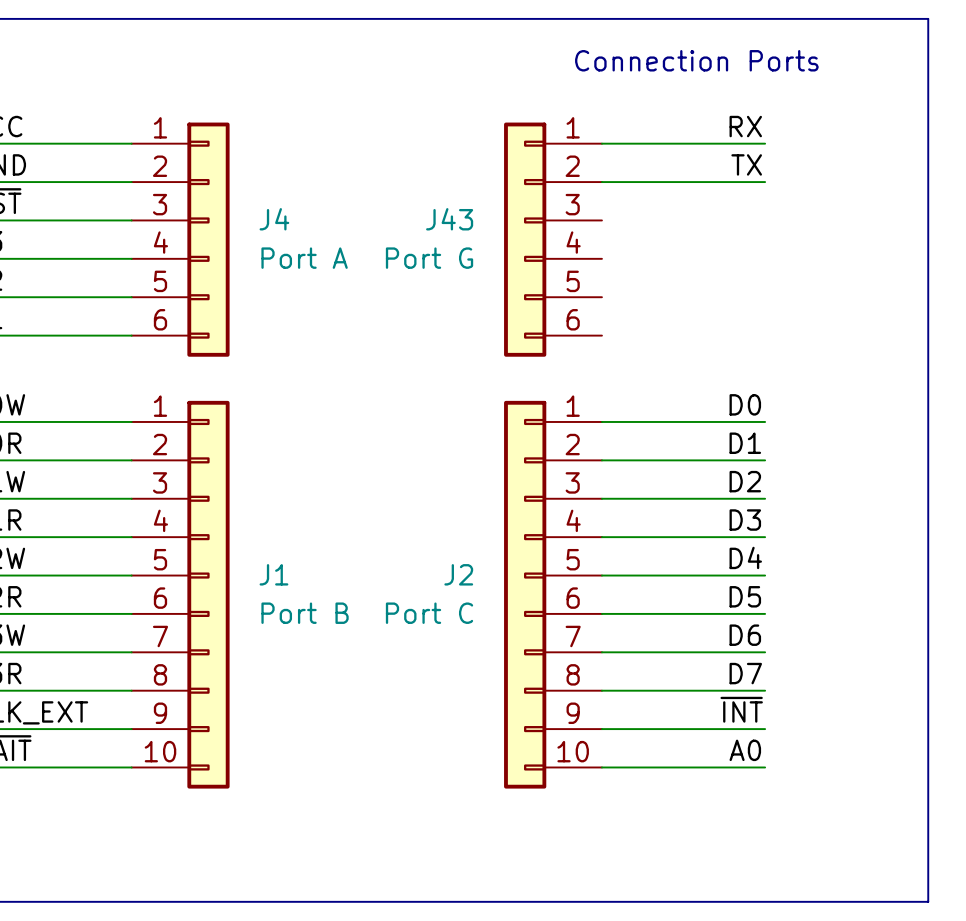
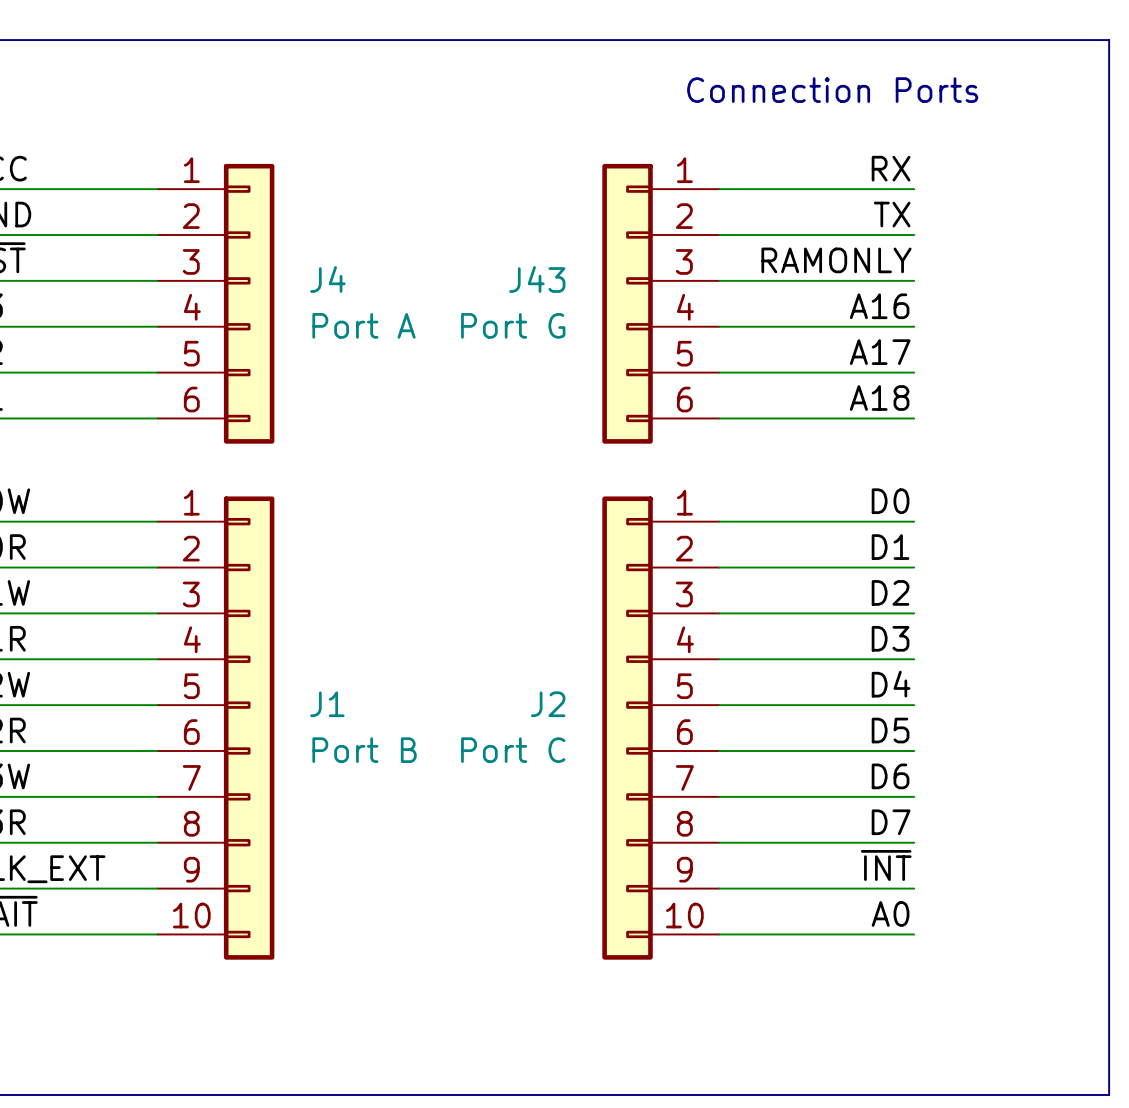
label: none -> RAMONLY (836, 260)
wire: none -> (719, 280) (914, 280)
label: none -> A16 (879, 306)
wire: none -> (719, 326) (914, 326)
label: none -> A17 (880, 352)
wire: none -> (719, 372) (914, 372)
label: none -> A18 (879, 398)
wire: none -> (719, 418) (914, 418)

